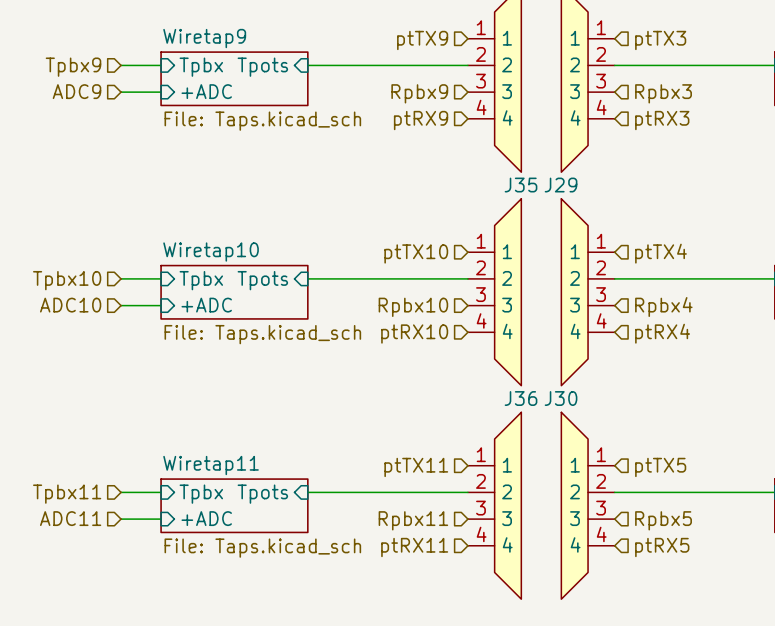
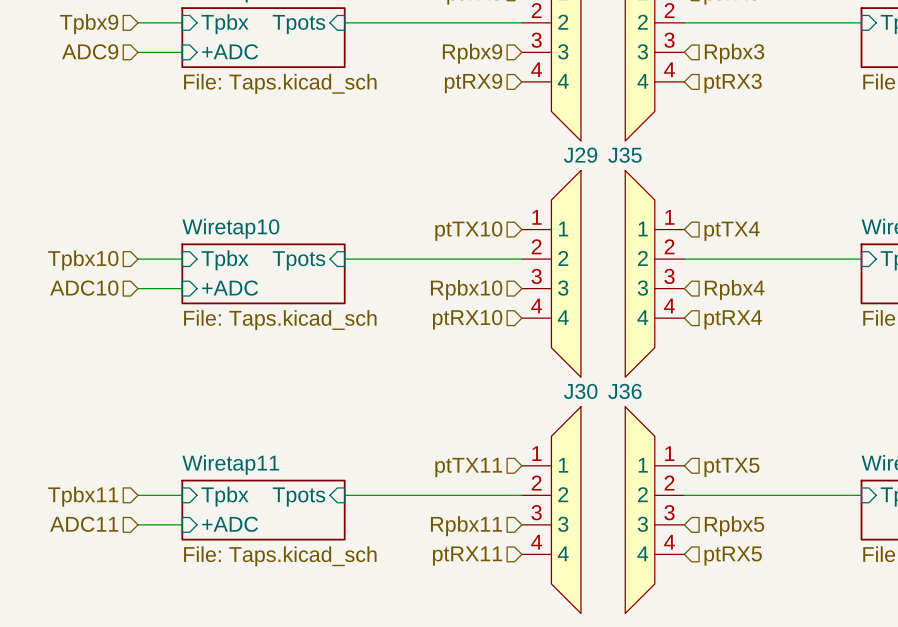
J35 name: J35 (521, 185) -> J29 (580, 155)
J29 name: J29 (561, 185) -> J35 (624, 155)
J36 name: J36 (521, 398) -> J30 (580, 391)
J30 name: J30 (561, 398) -> J36 (624, 391)

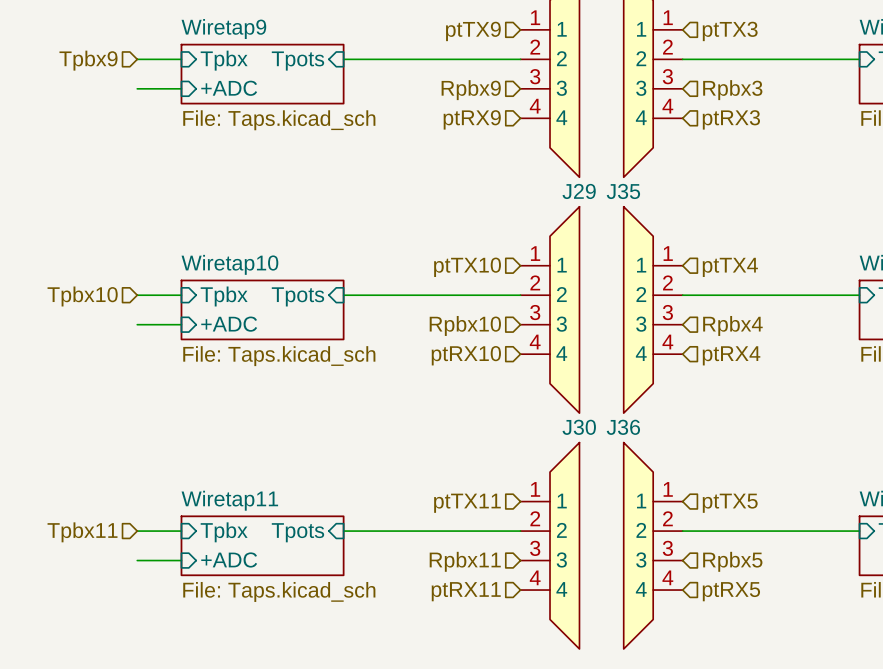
hierarchical label: ADC9 (90, 51) -> none
hierarchical label: ADC10 (84, 288) -> none
hierarchical label: ADC11 (84, 524) -> none

